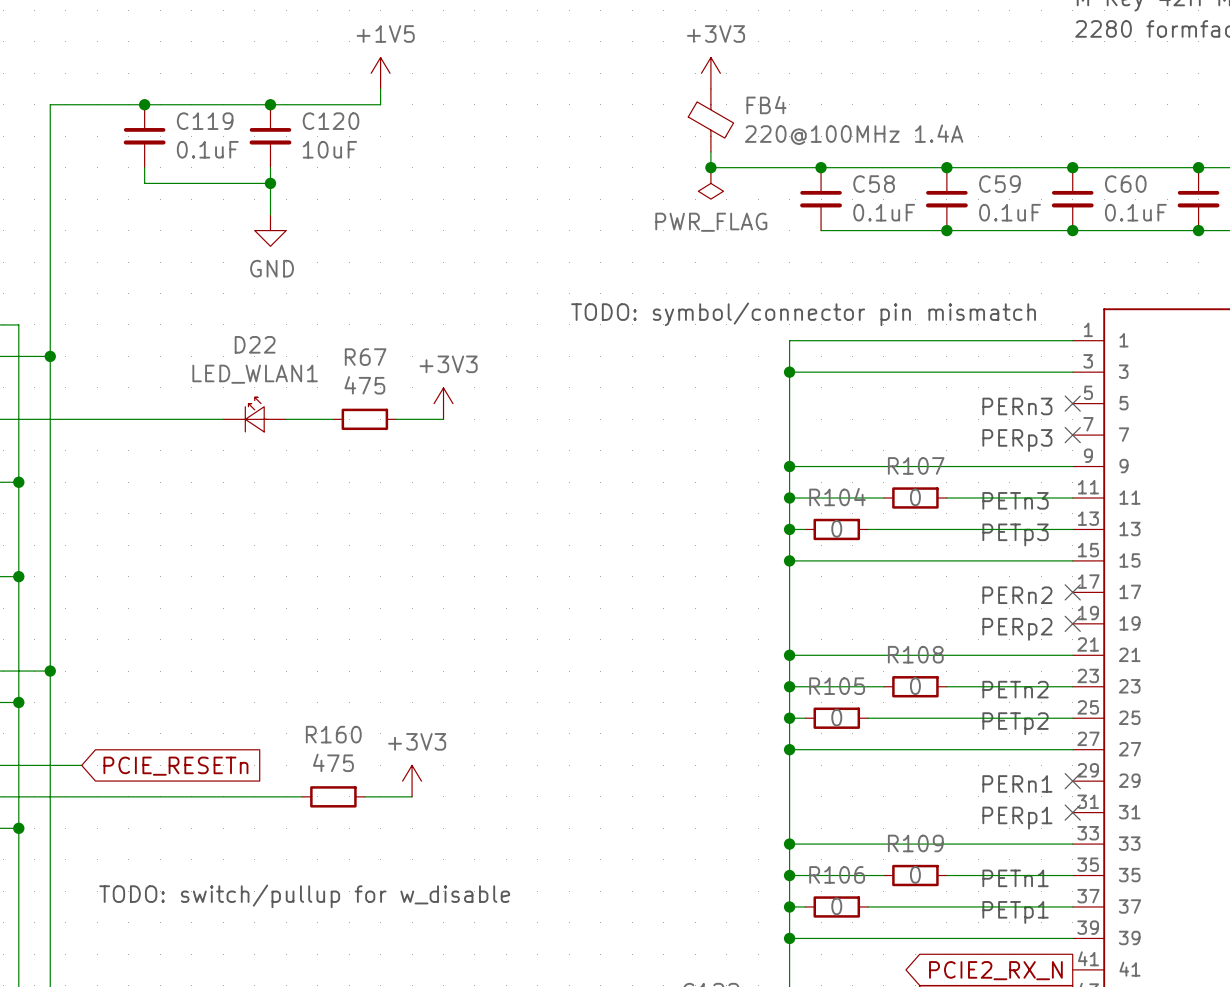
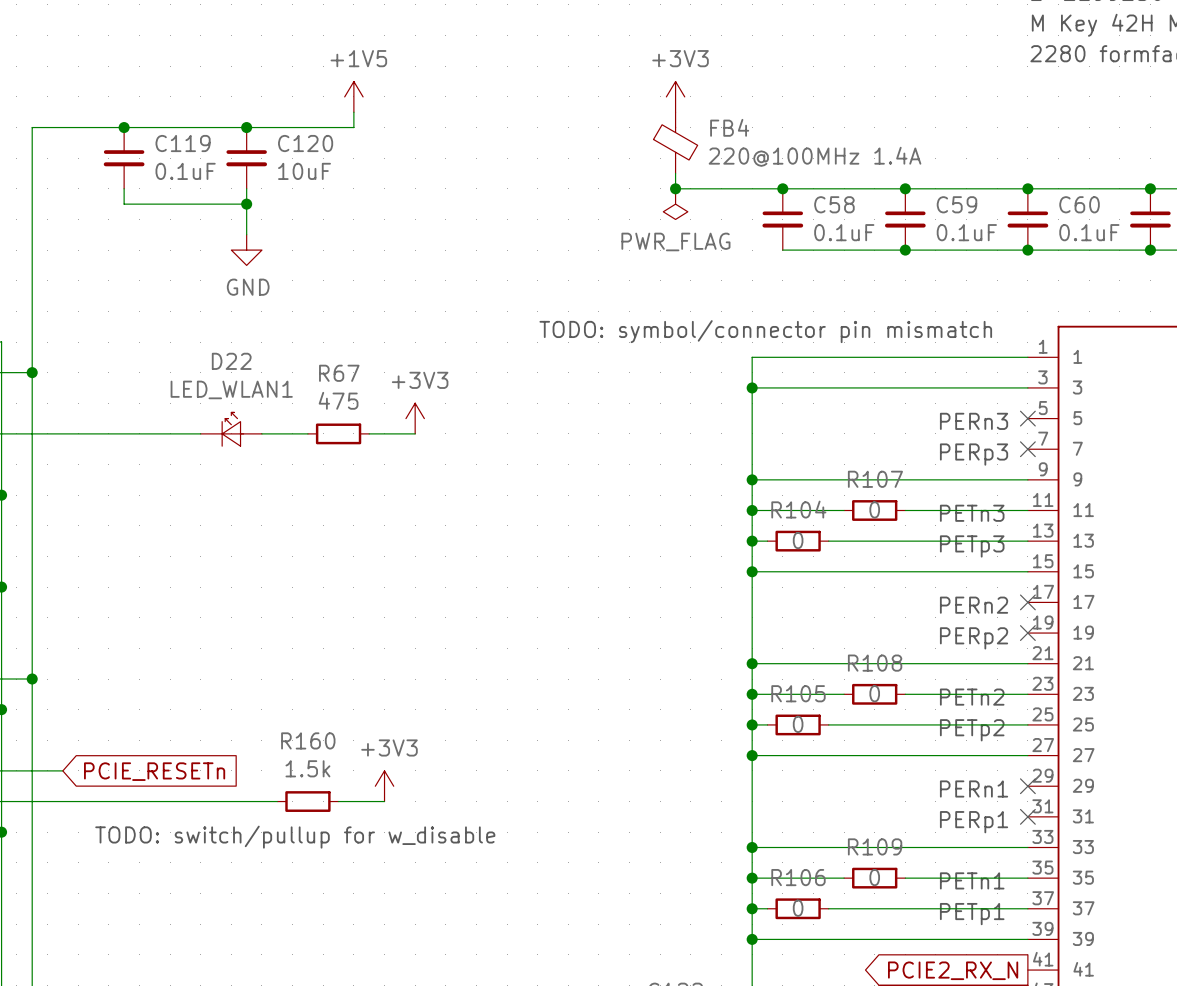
R160 value: 475 (333, 762) -> 1.5k (307, 768)
text position: TODO: switch/pullup for w_disable (304, 896) -> TODO: switch/pullup for w_disable (295, 837)

